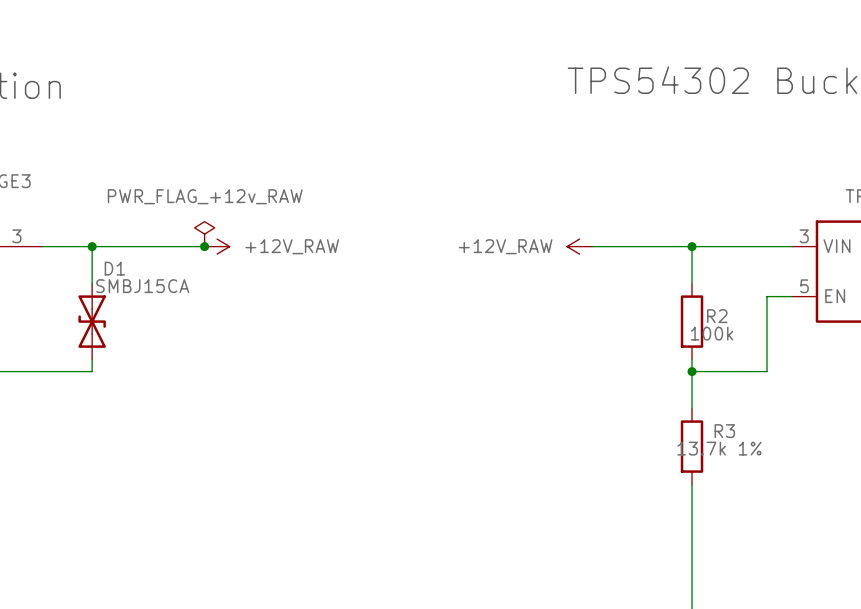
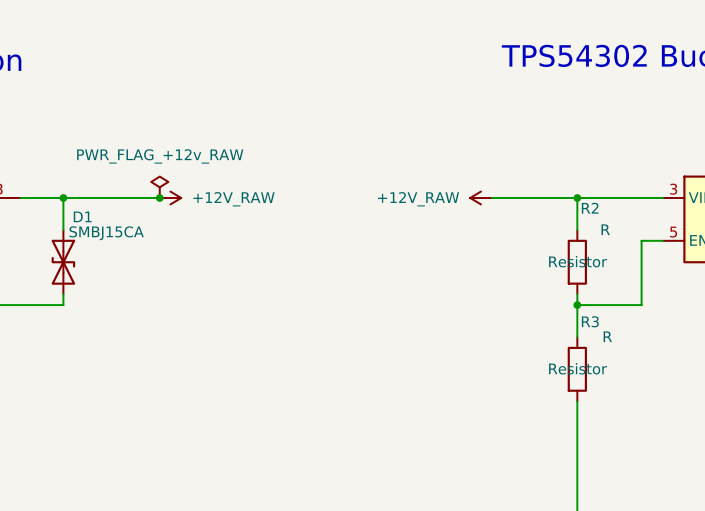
R2 name position: R2 (717, 316) -> R2 (590, 208)
R2 text: none -> Resistor (578, 261)
R2 value: 100k (712, 333) -> R (605, 229)
R3 name position: R3 (724, 431) -> R3 (590, 321)
R3 text: none -> Resistor (578, 368)
R3 value: 13.7k 1% (719, 448) -> R (607, 336)

